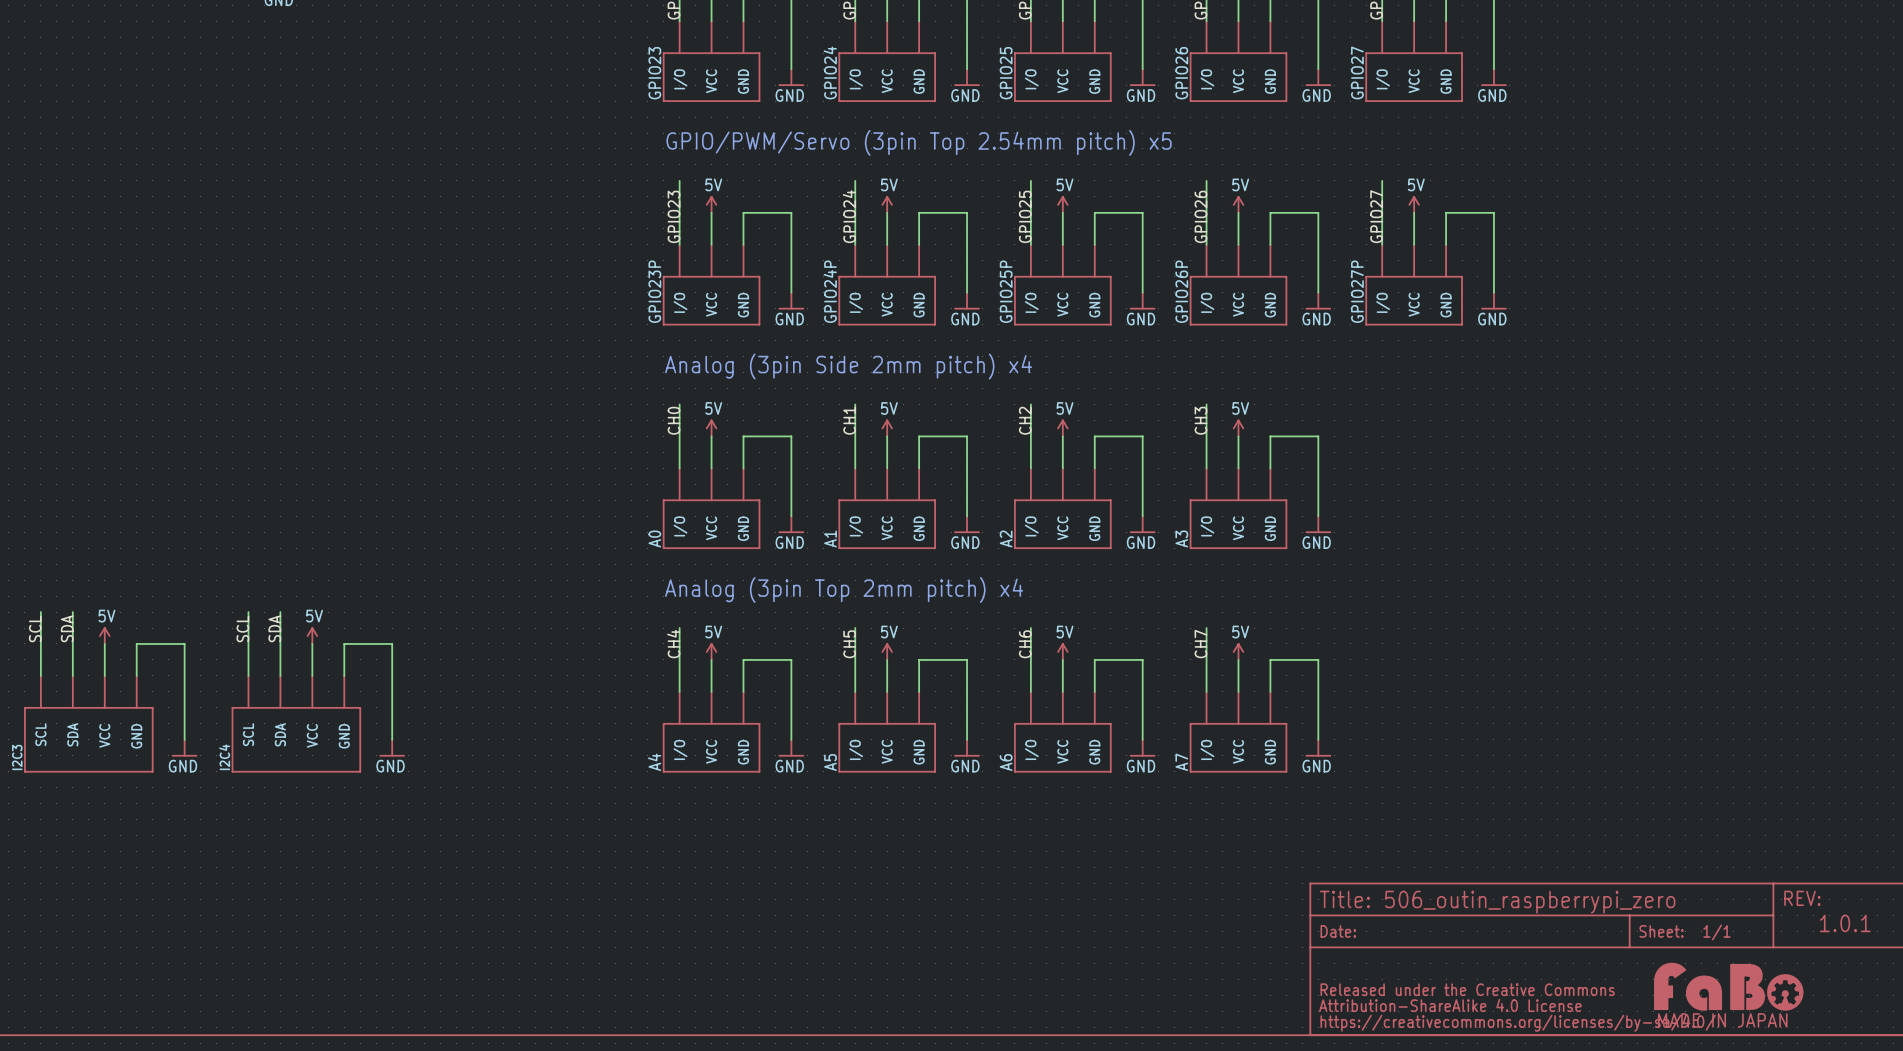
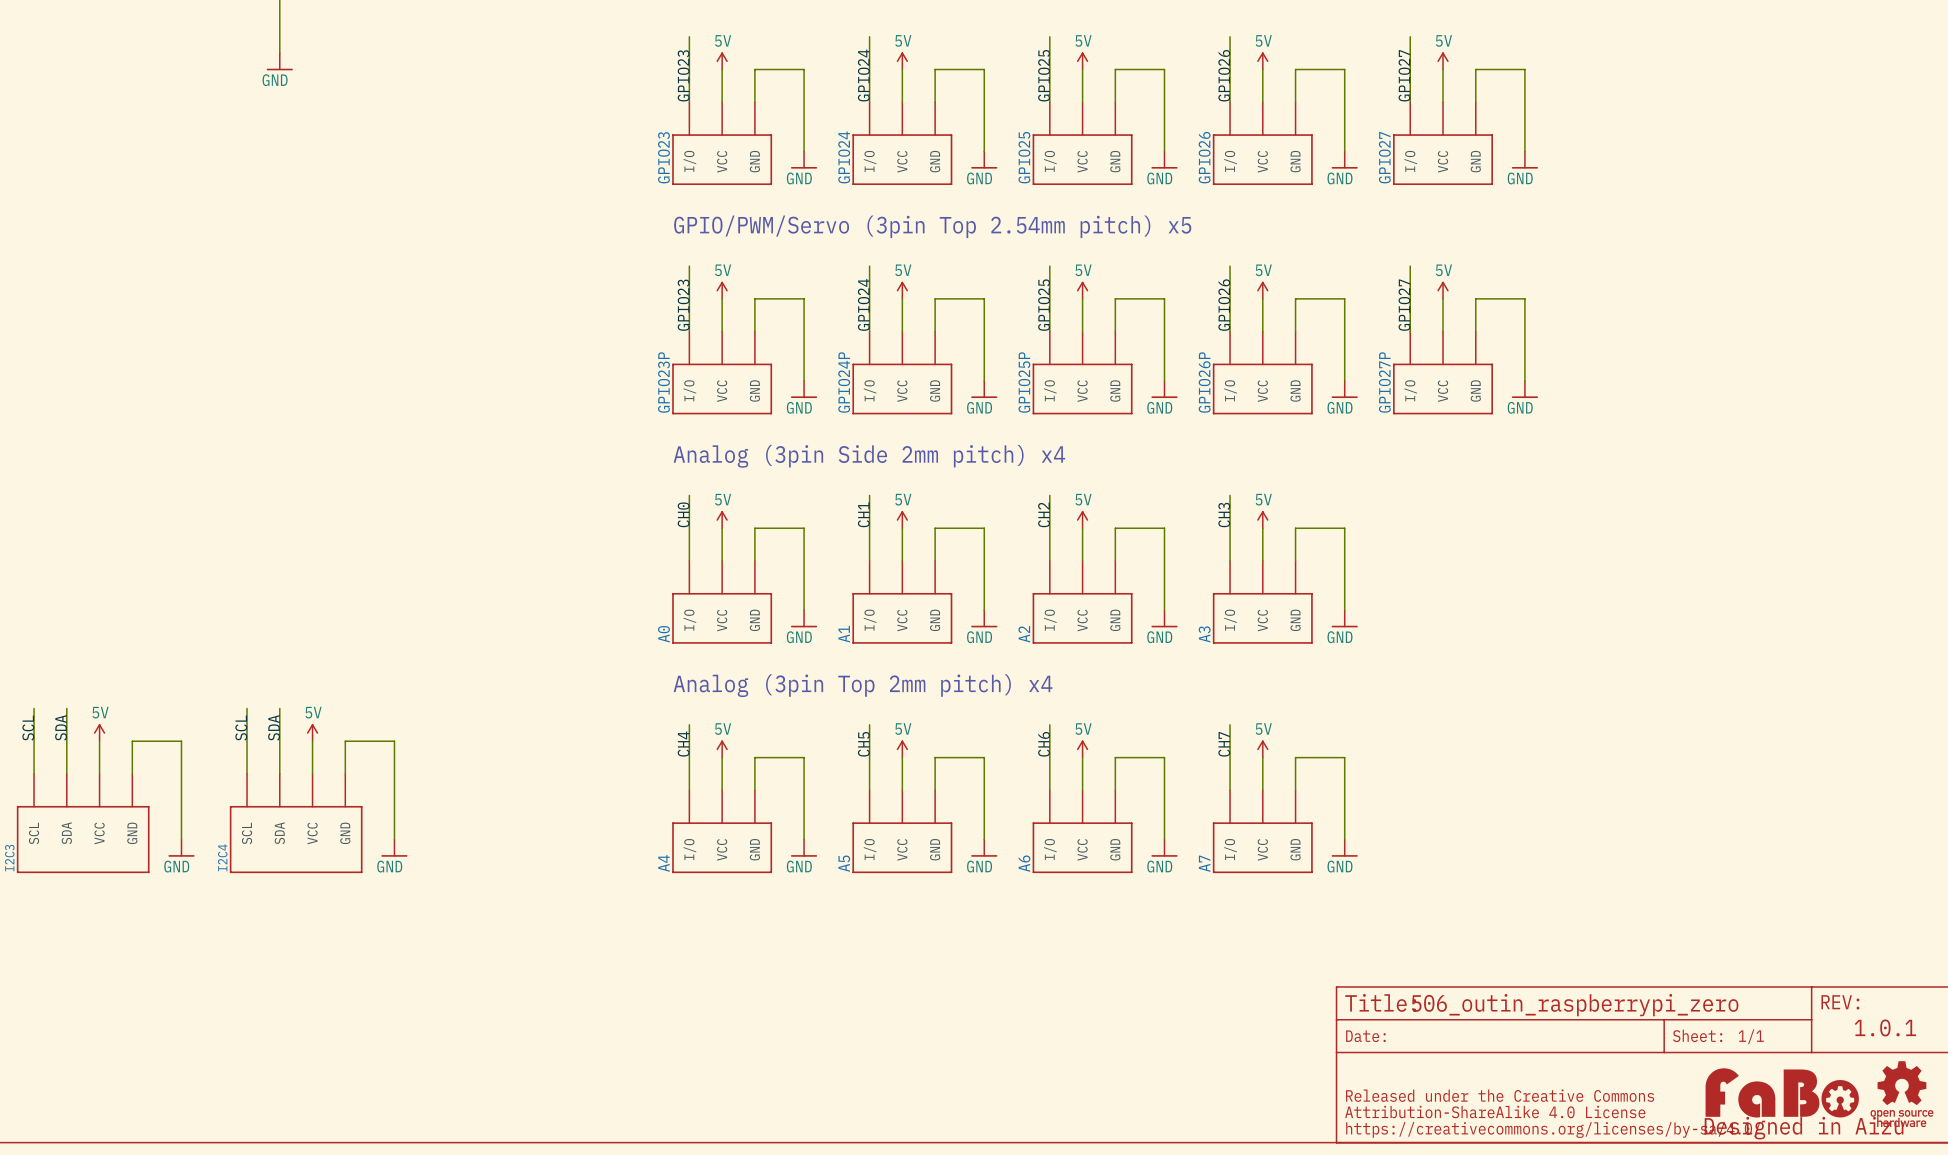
part: (1728, 986) -> none
part: none -> (1782, 1092)
part: none -> (1901, 1094)

